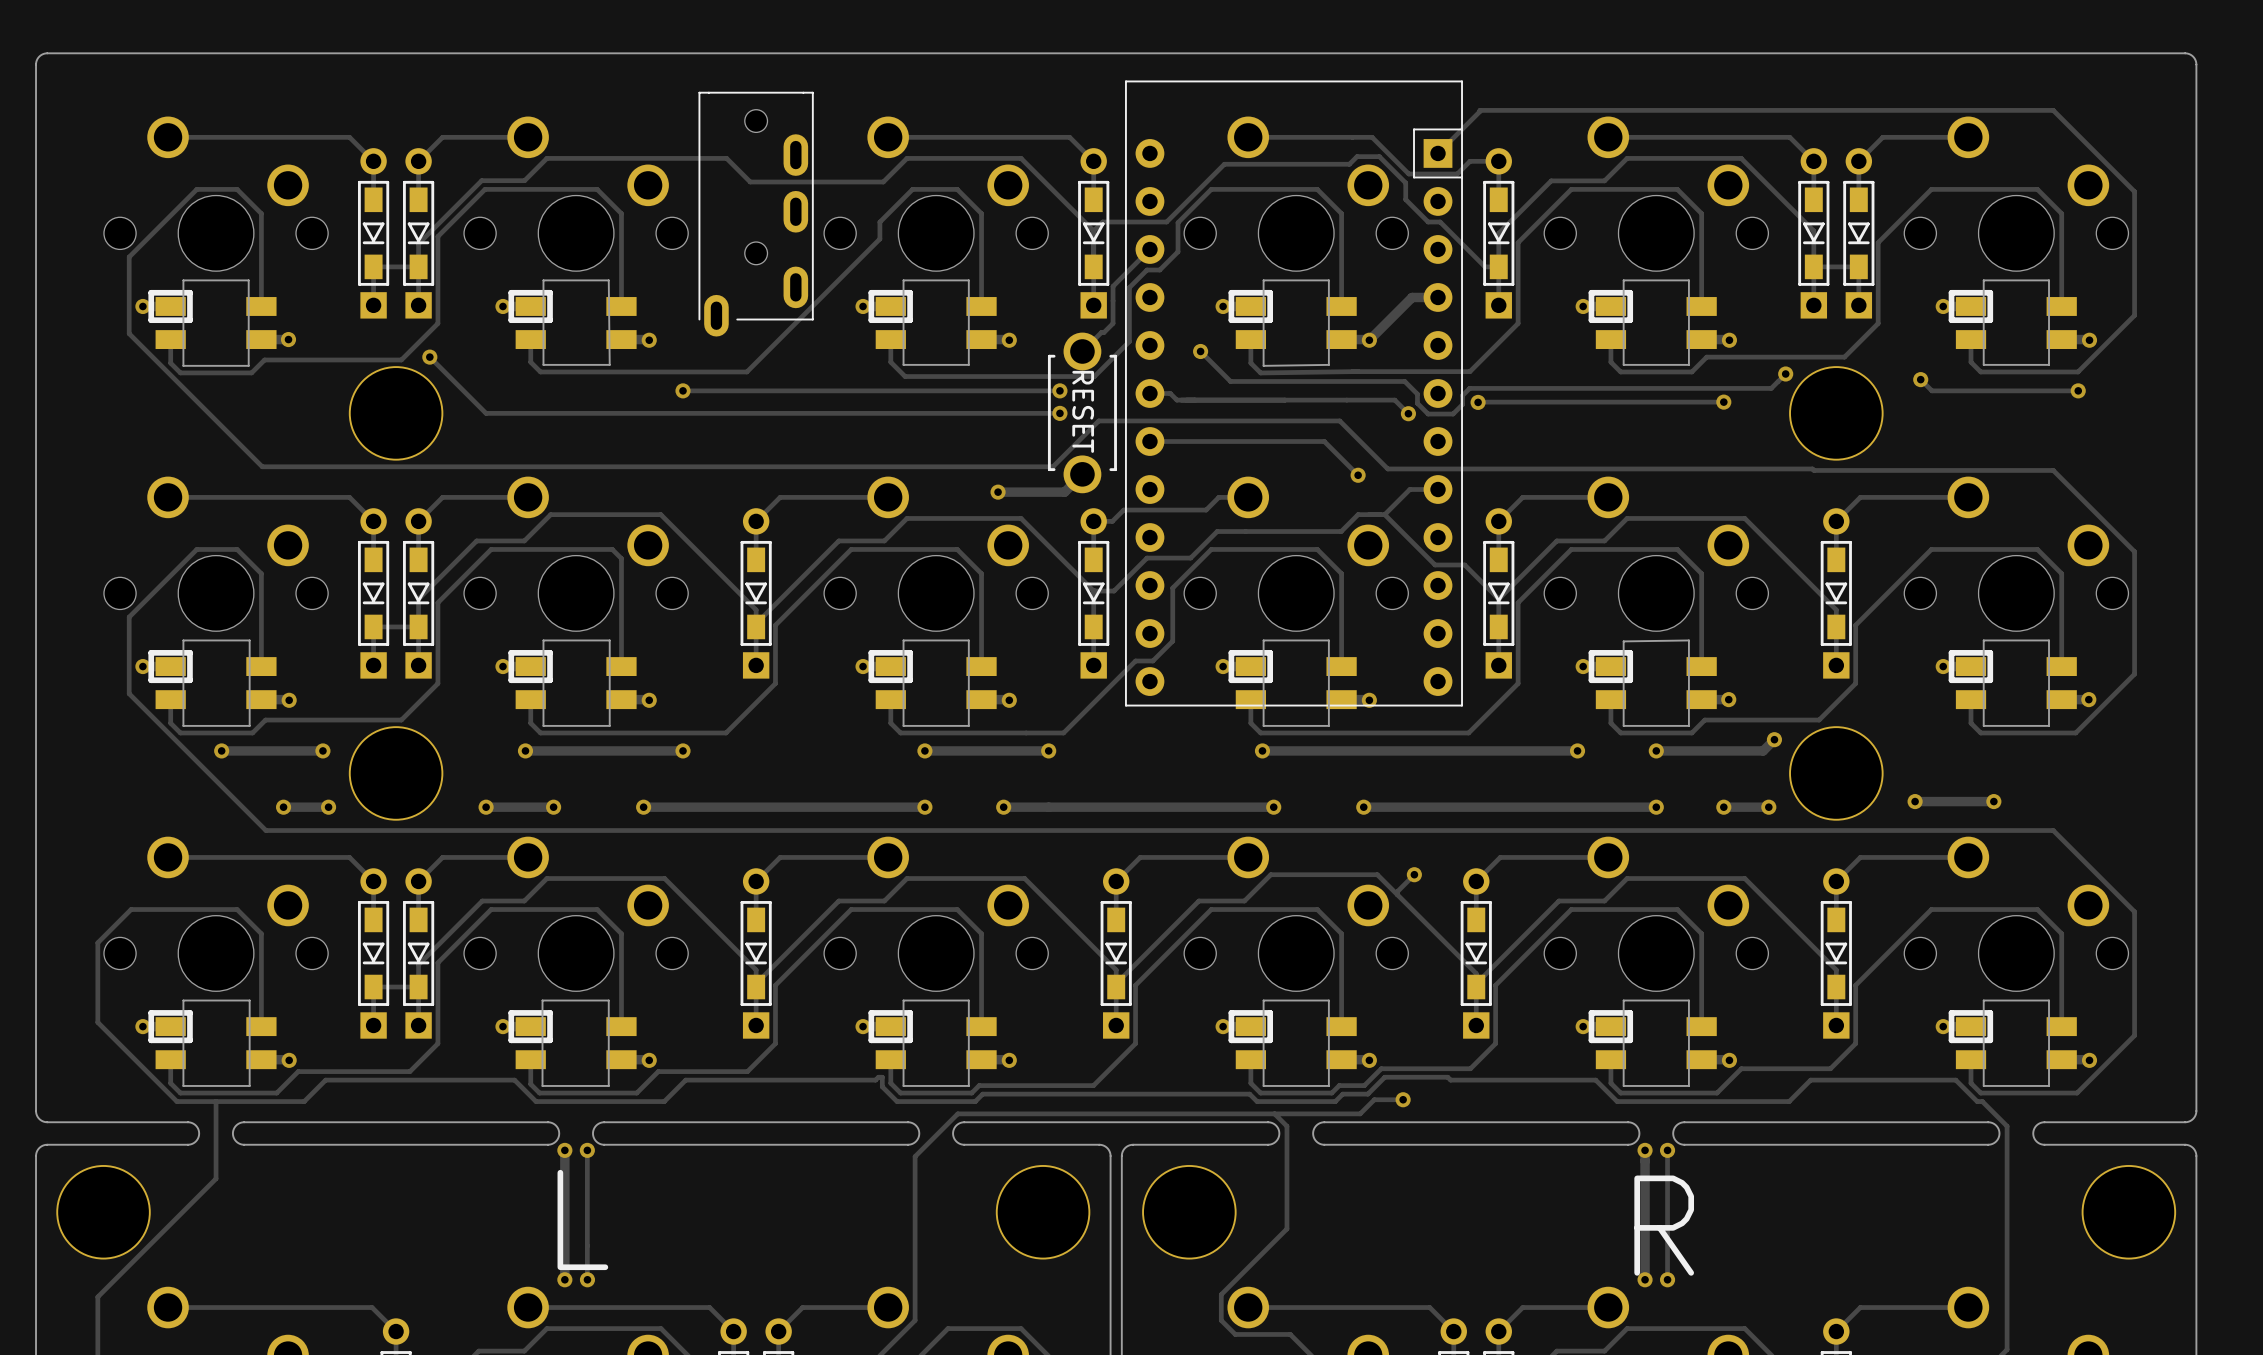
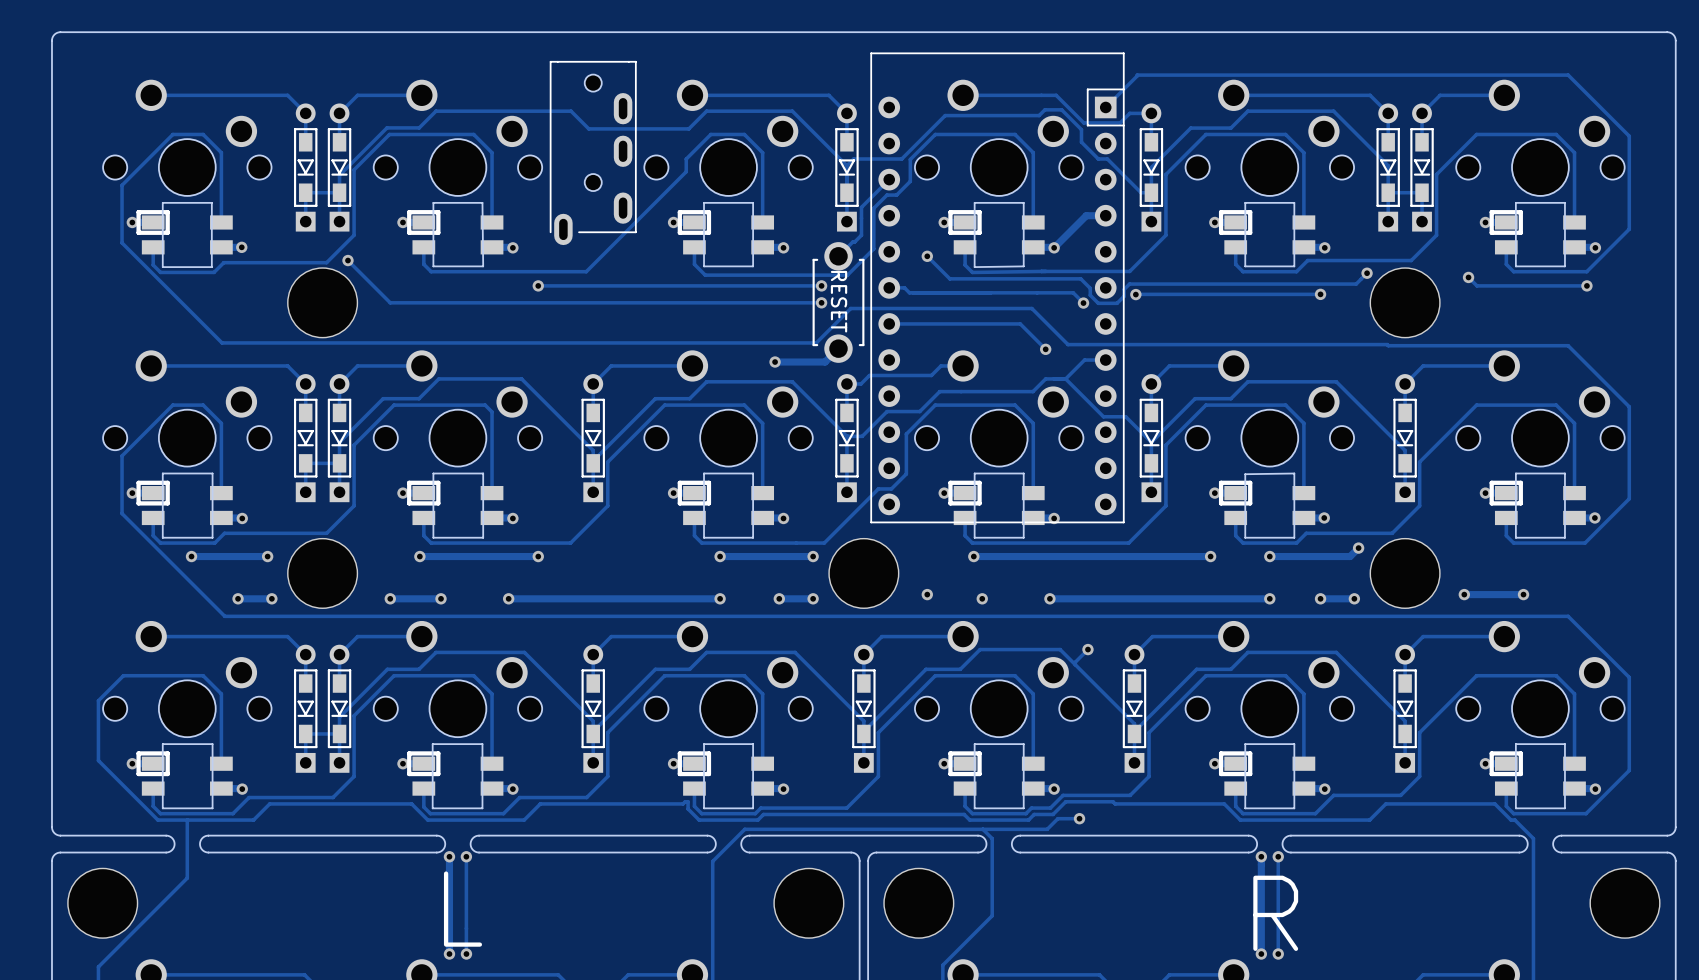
part: none -> (863, 573)
via: none -> (927, 594)
via: none -> (813, 598)
track: (1273, 807) (1048, 807) -> none

